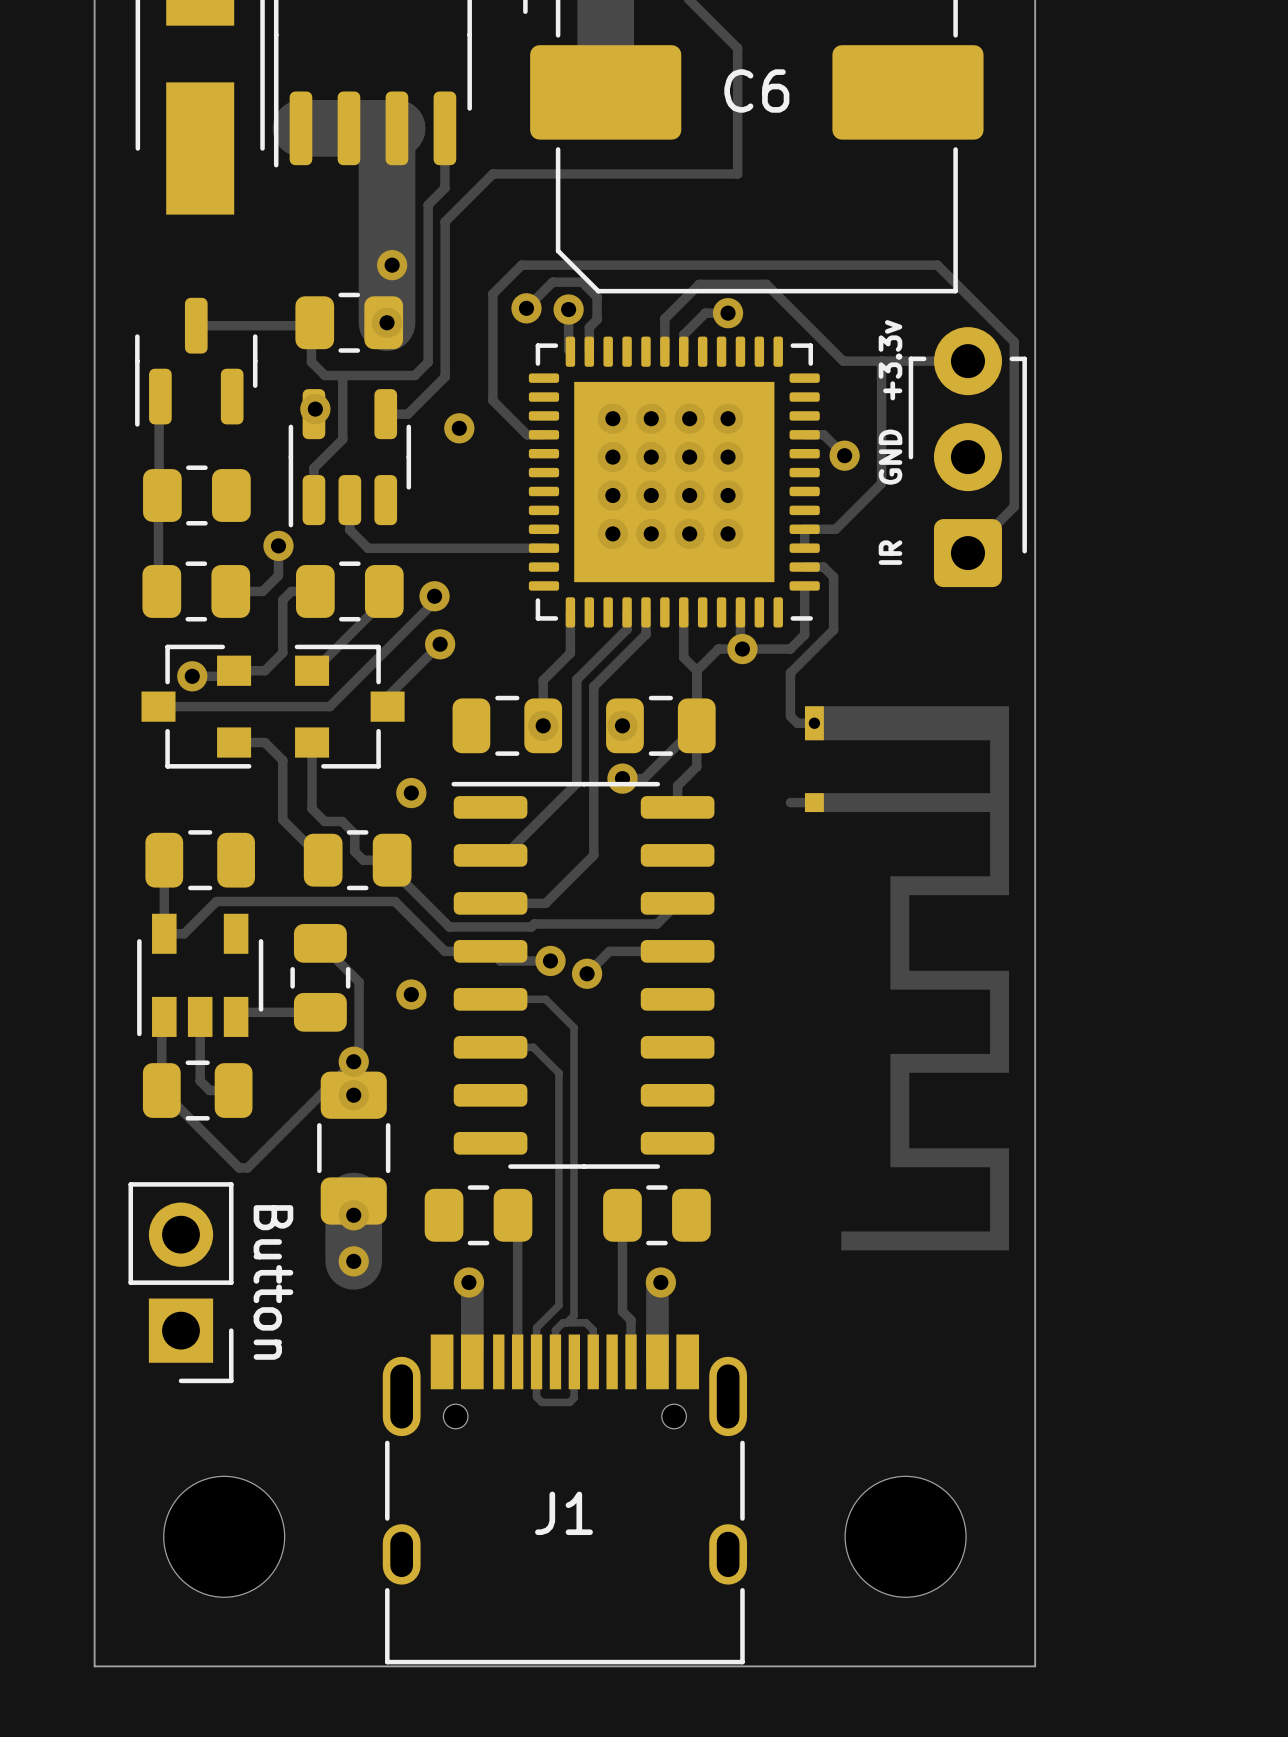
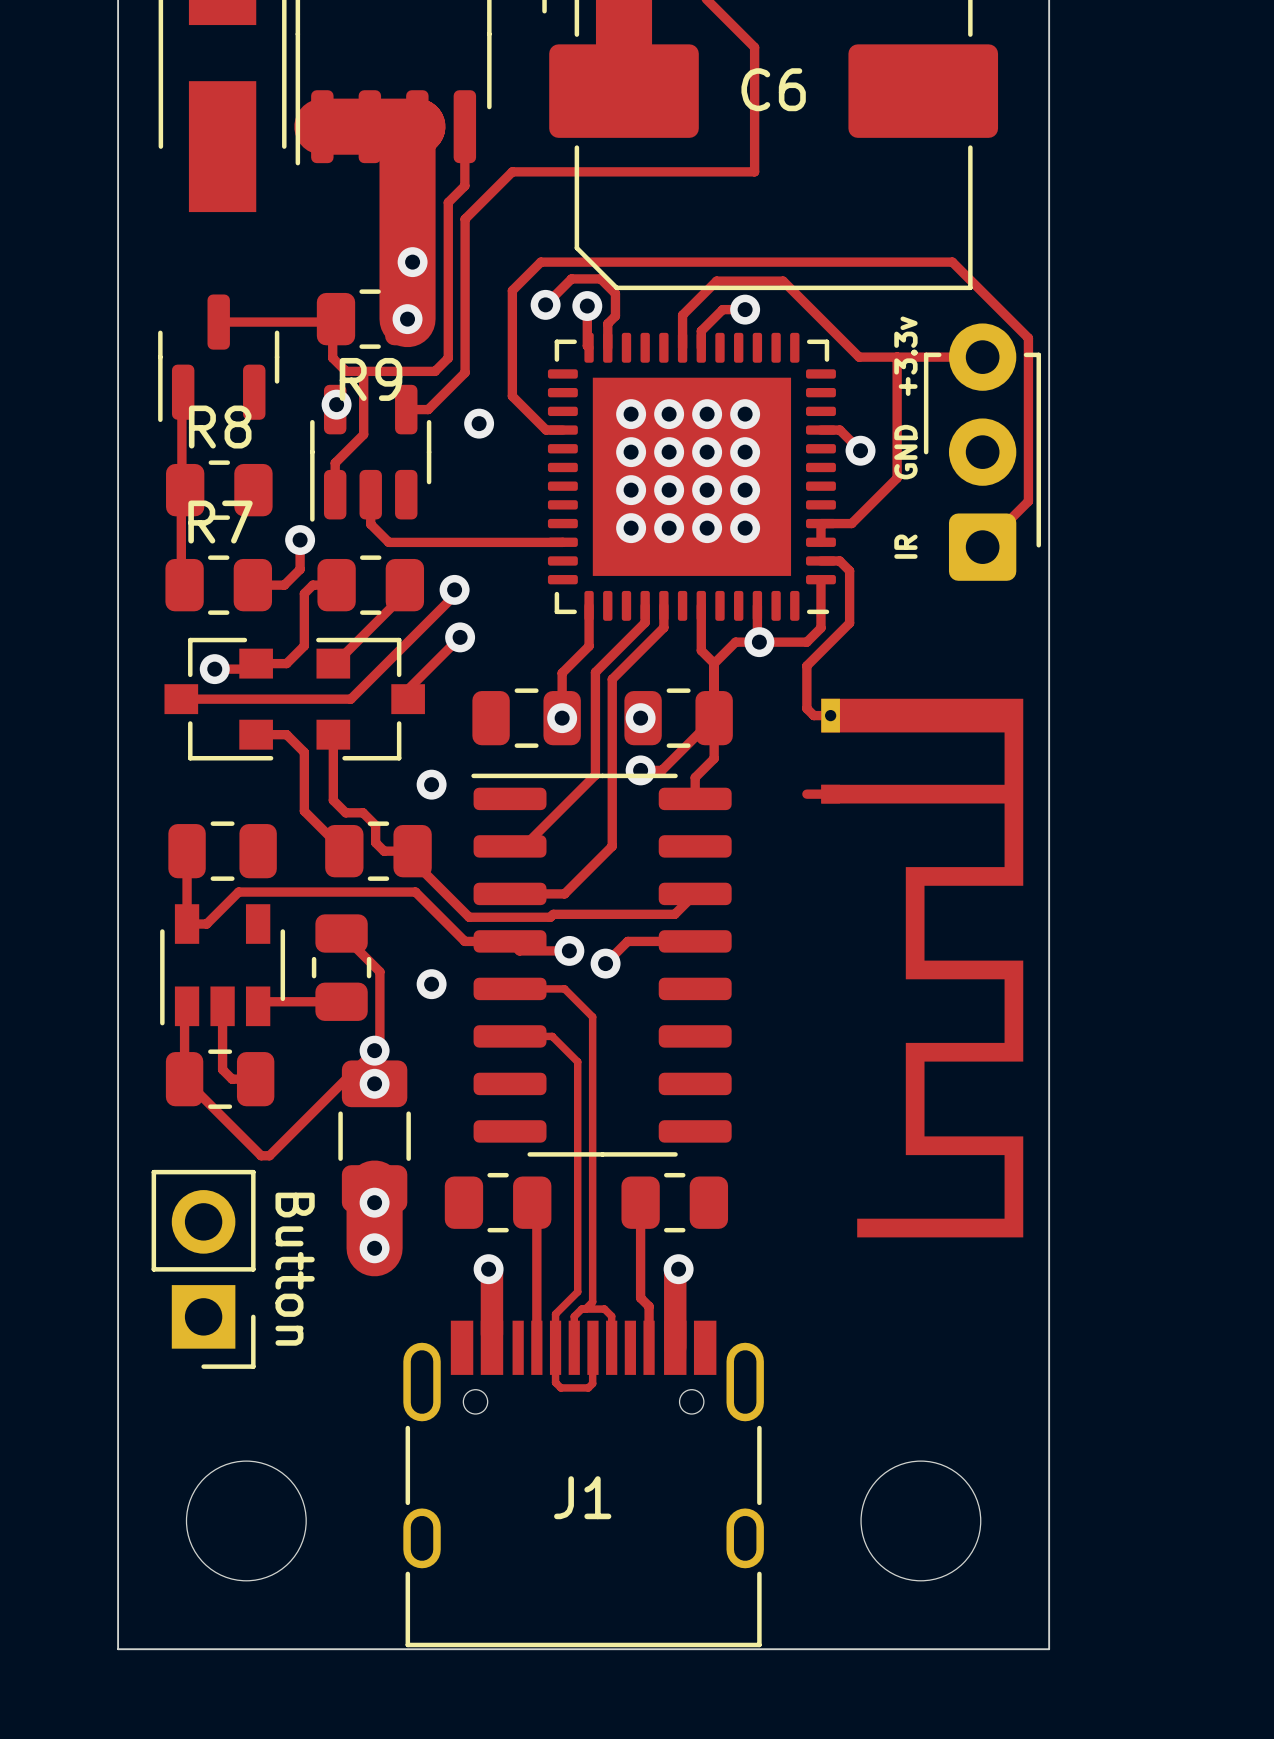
R9 name: none -> R9 (371, 379)
R8 name: none -> R8 (220, 427)
R7 name: none -> R7 (220, 522)

